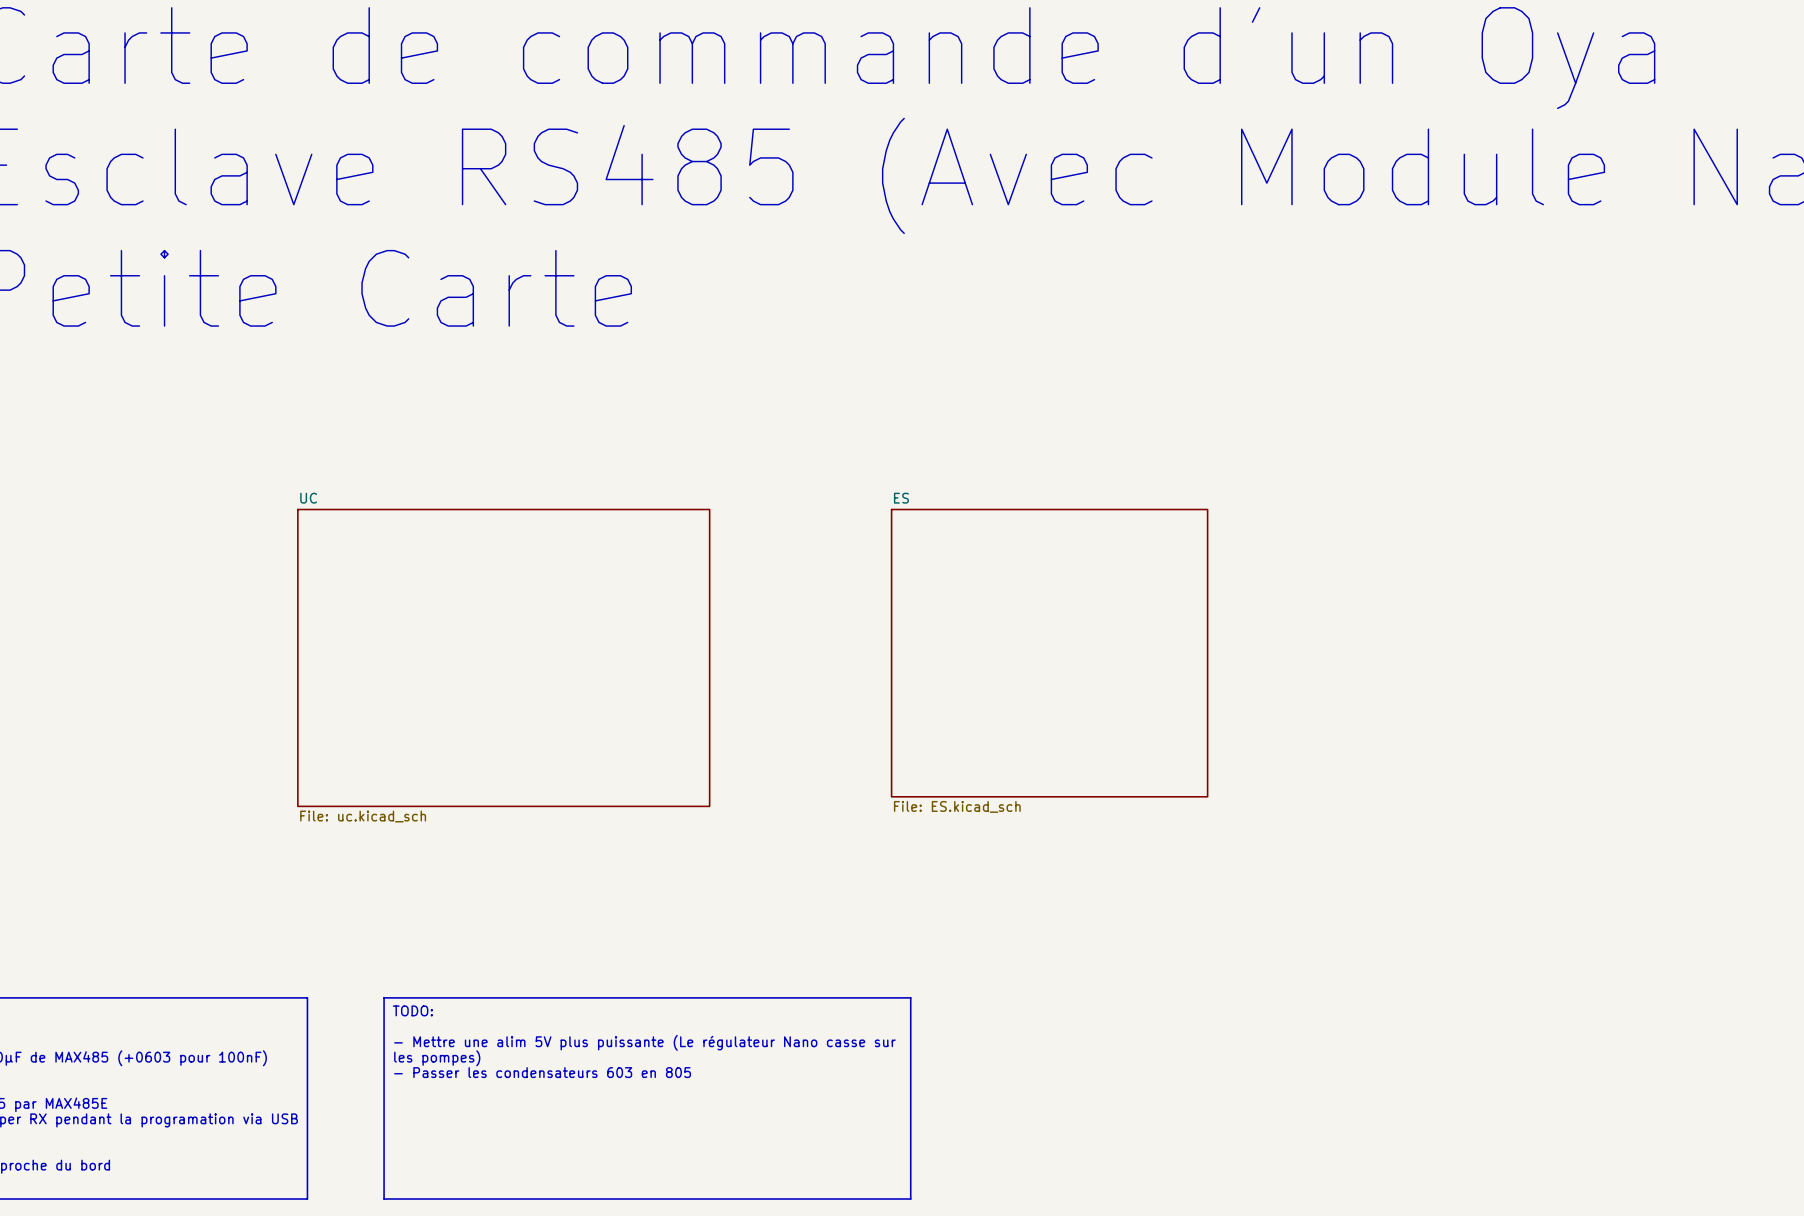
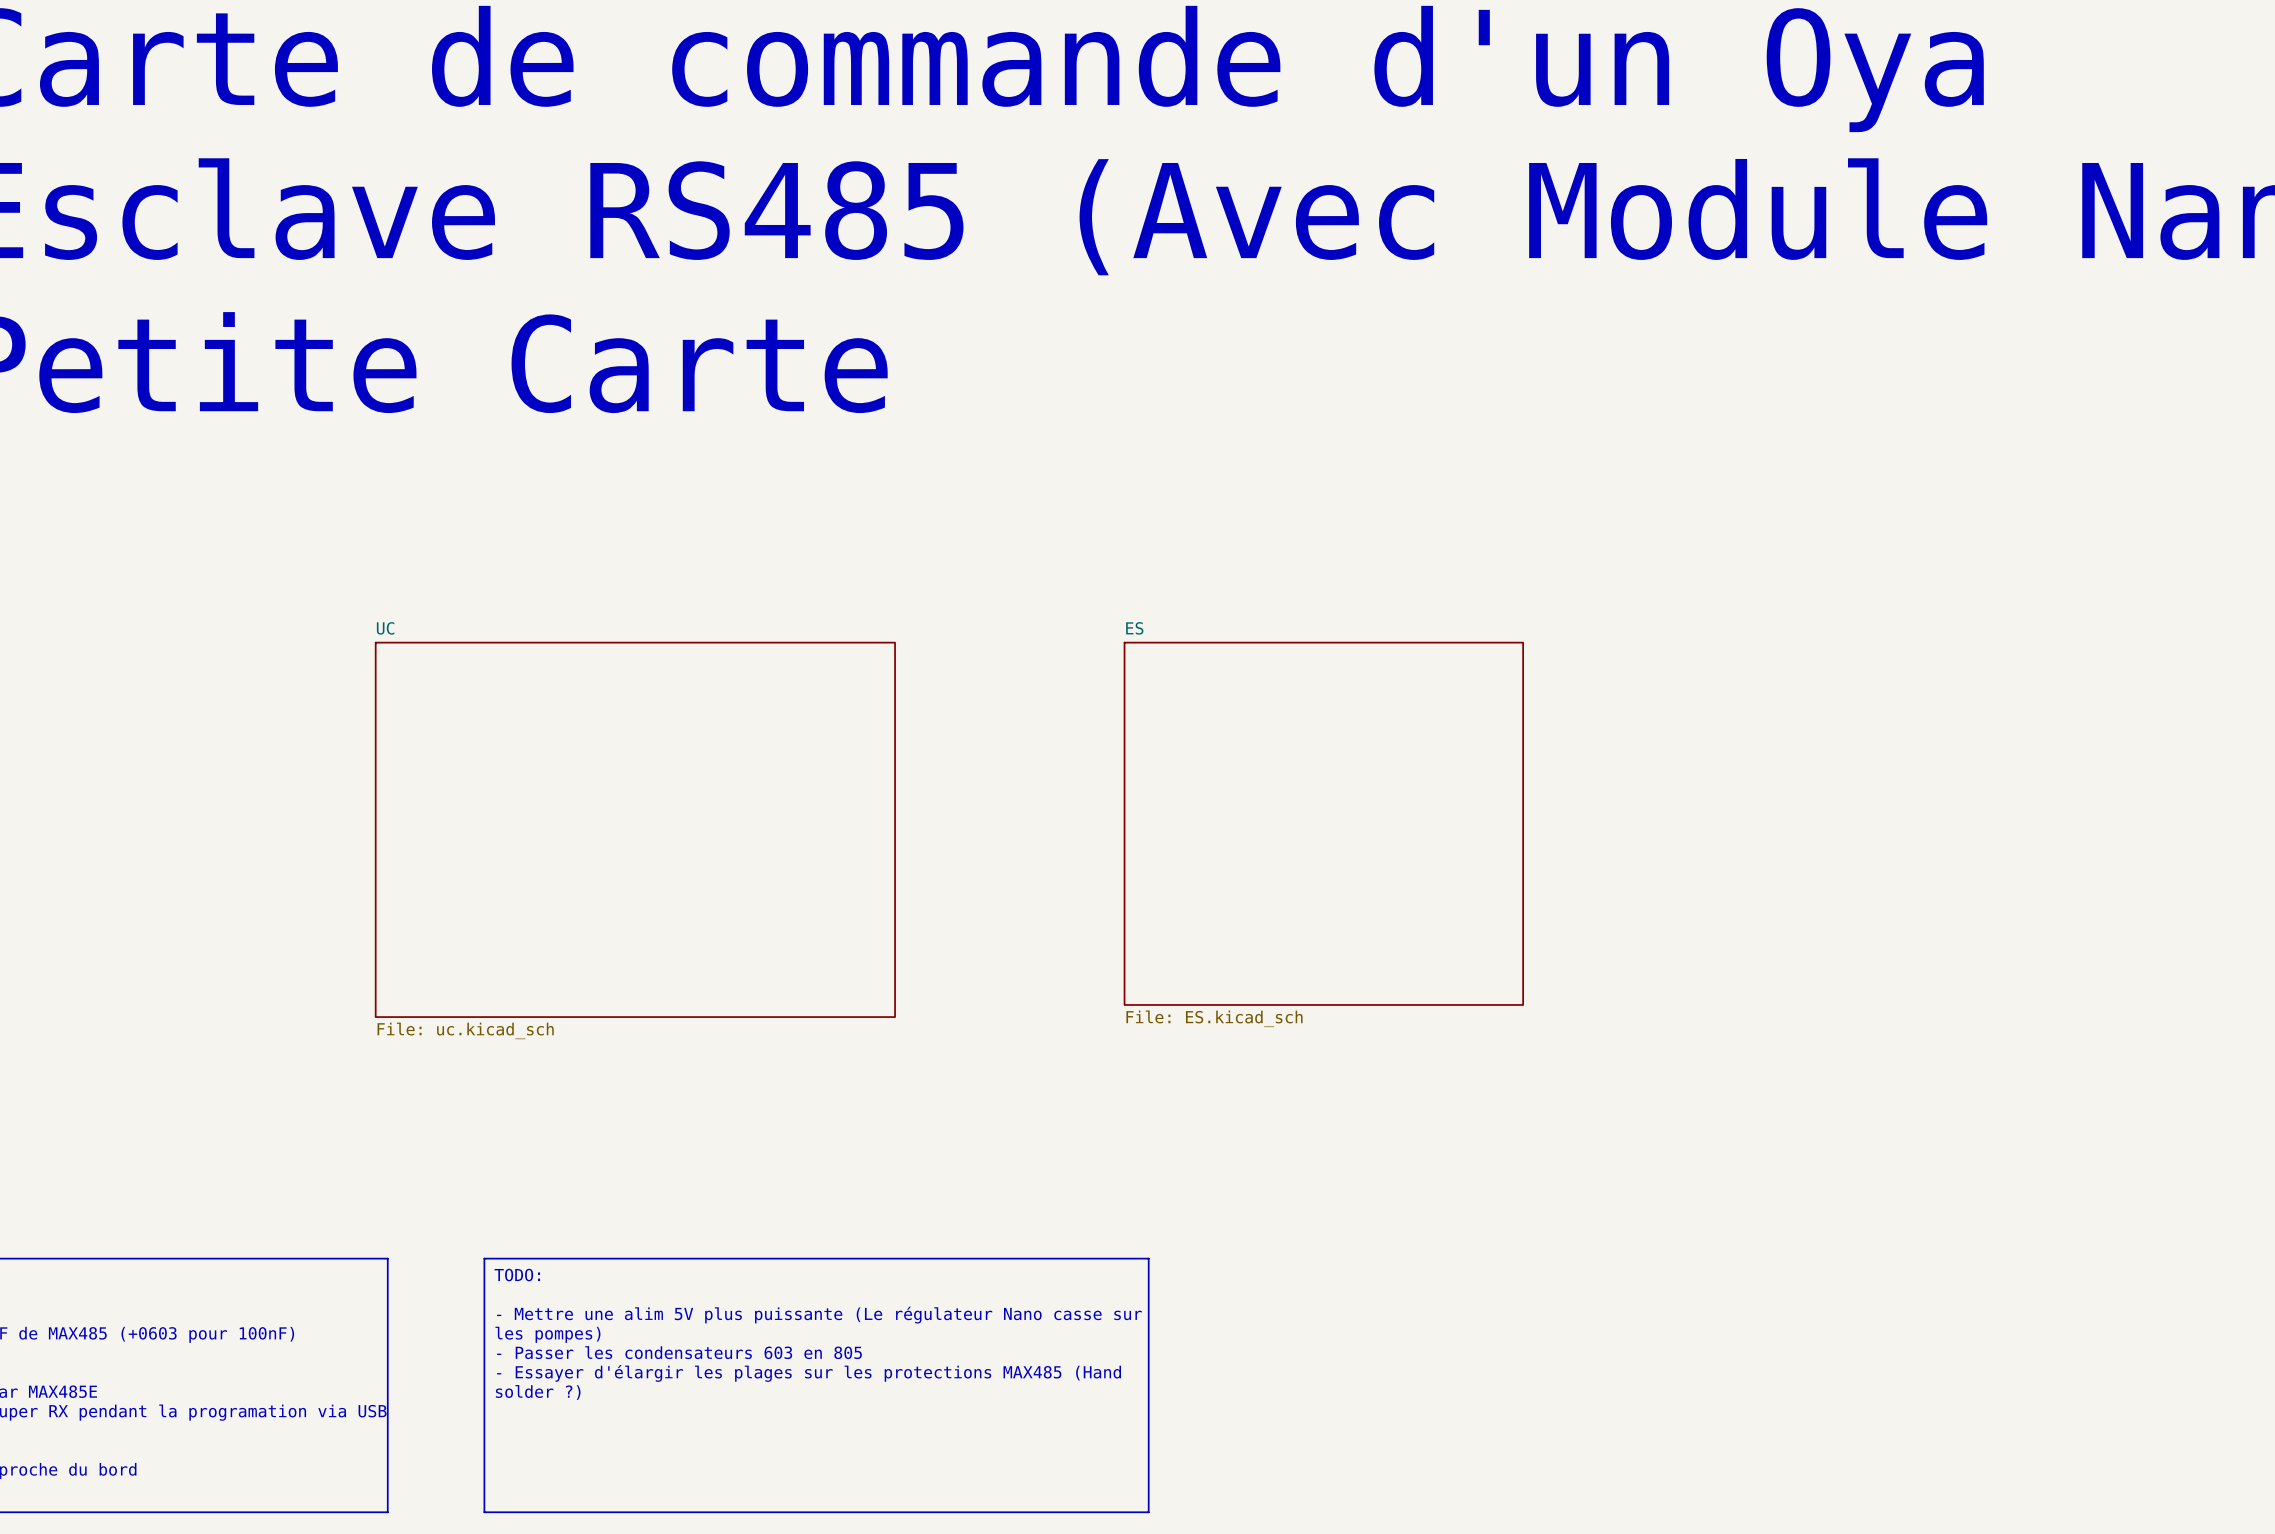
text: none -> - Essayer d'élargir les plages sur les protections MAX485 (Hand (809, 1373)
text: none -> solder ?) (538, 1392)

